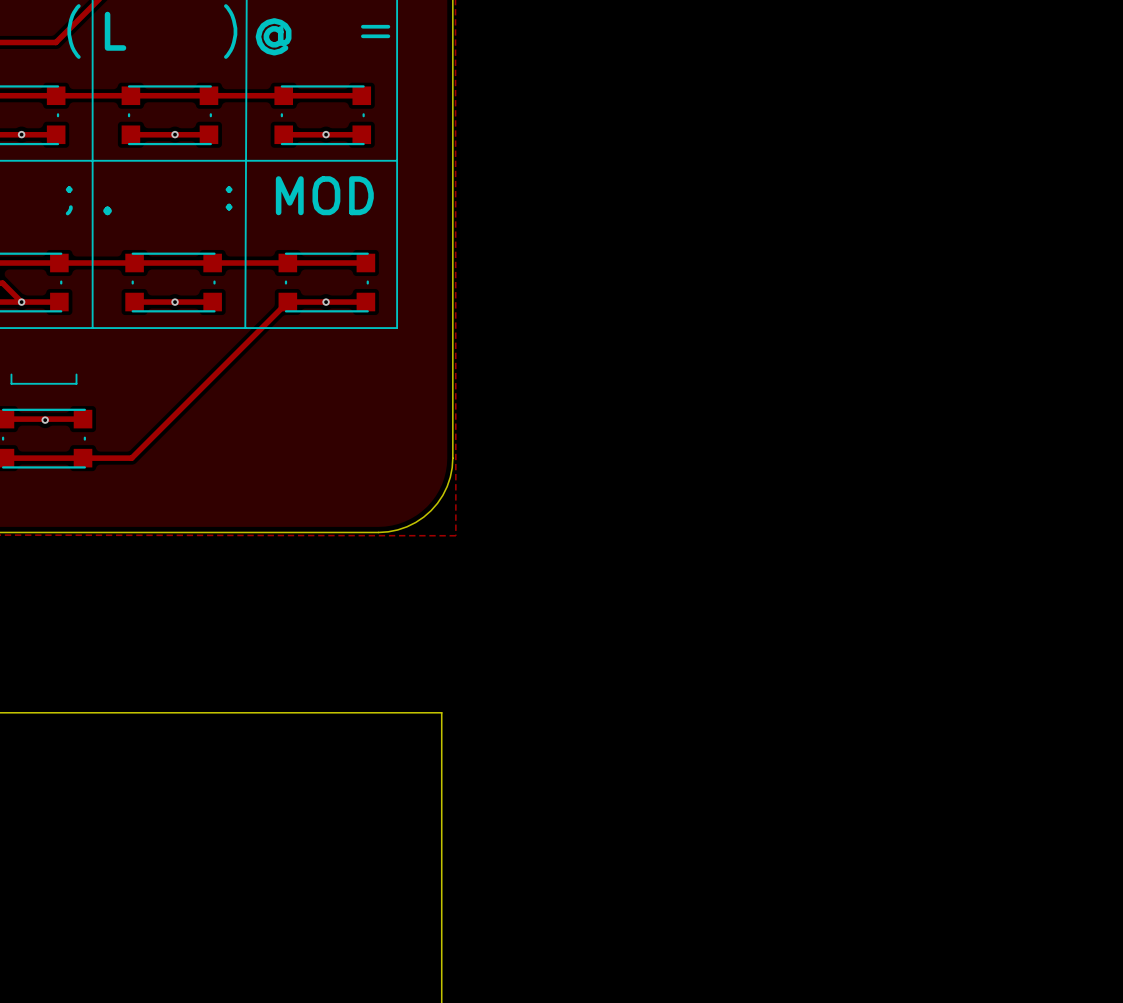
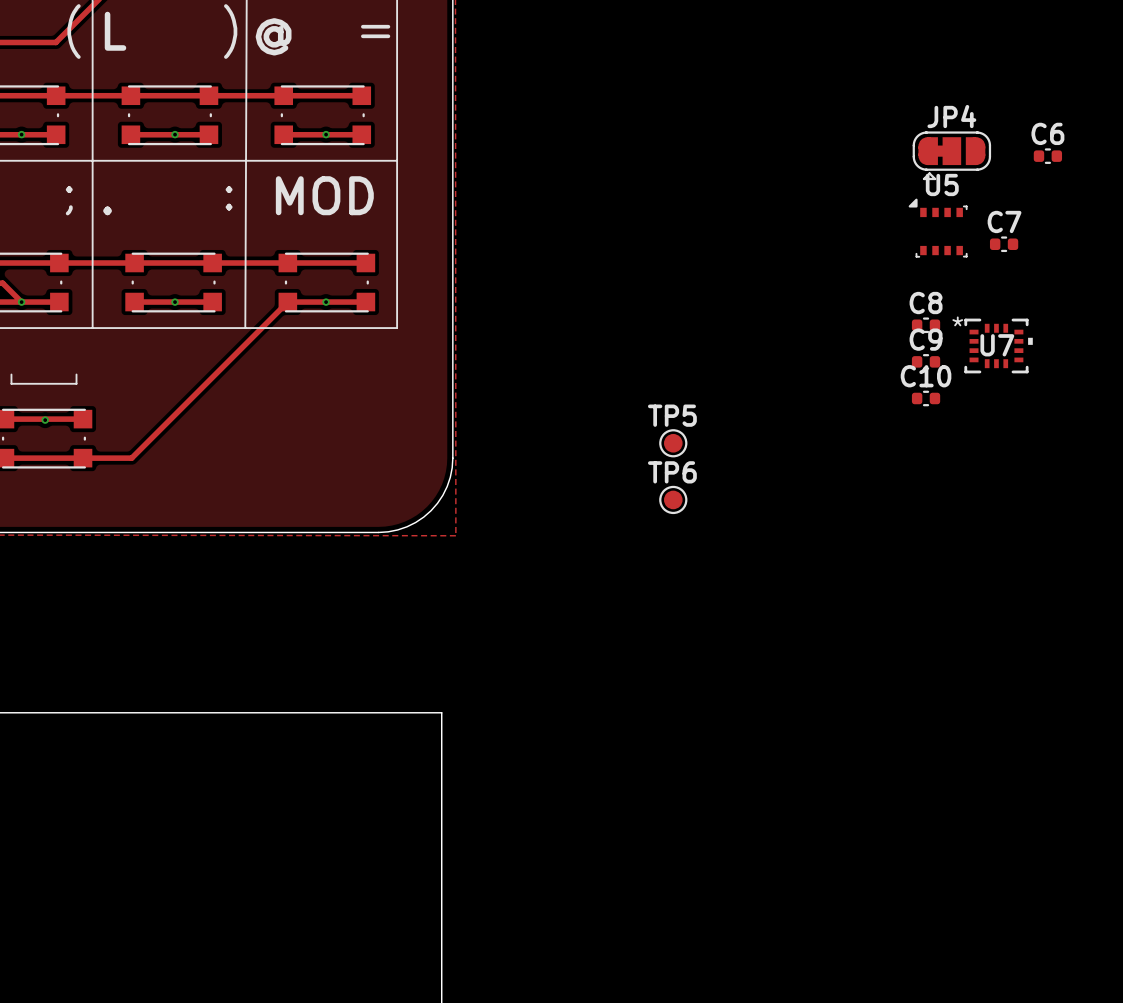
JP4: none -> (951, 155)
C6: none -> (1047, 156)
U5: none -> (938, 228)
C7: none -> (1004, 244)
C8: none -> (926, 325)
U7: none -> (998, 345)
C9: none -> (926, 361)
C10: none -> (926, 398)
TP5: none -> (673, 443)
TP6: none -> (673, 499)

